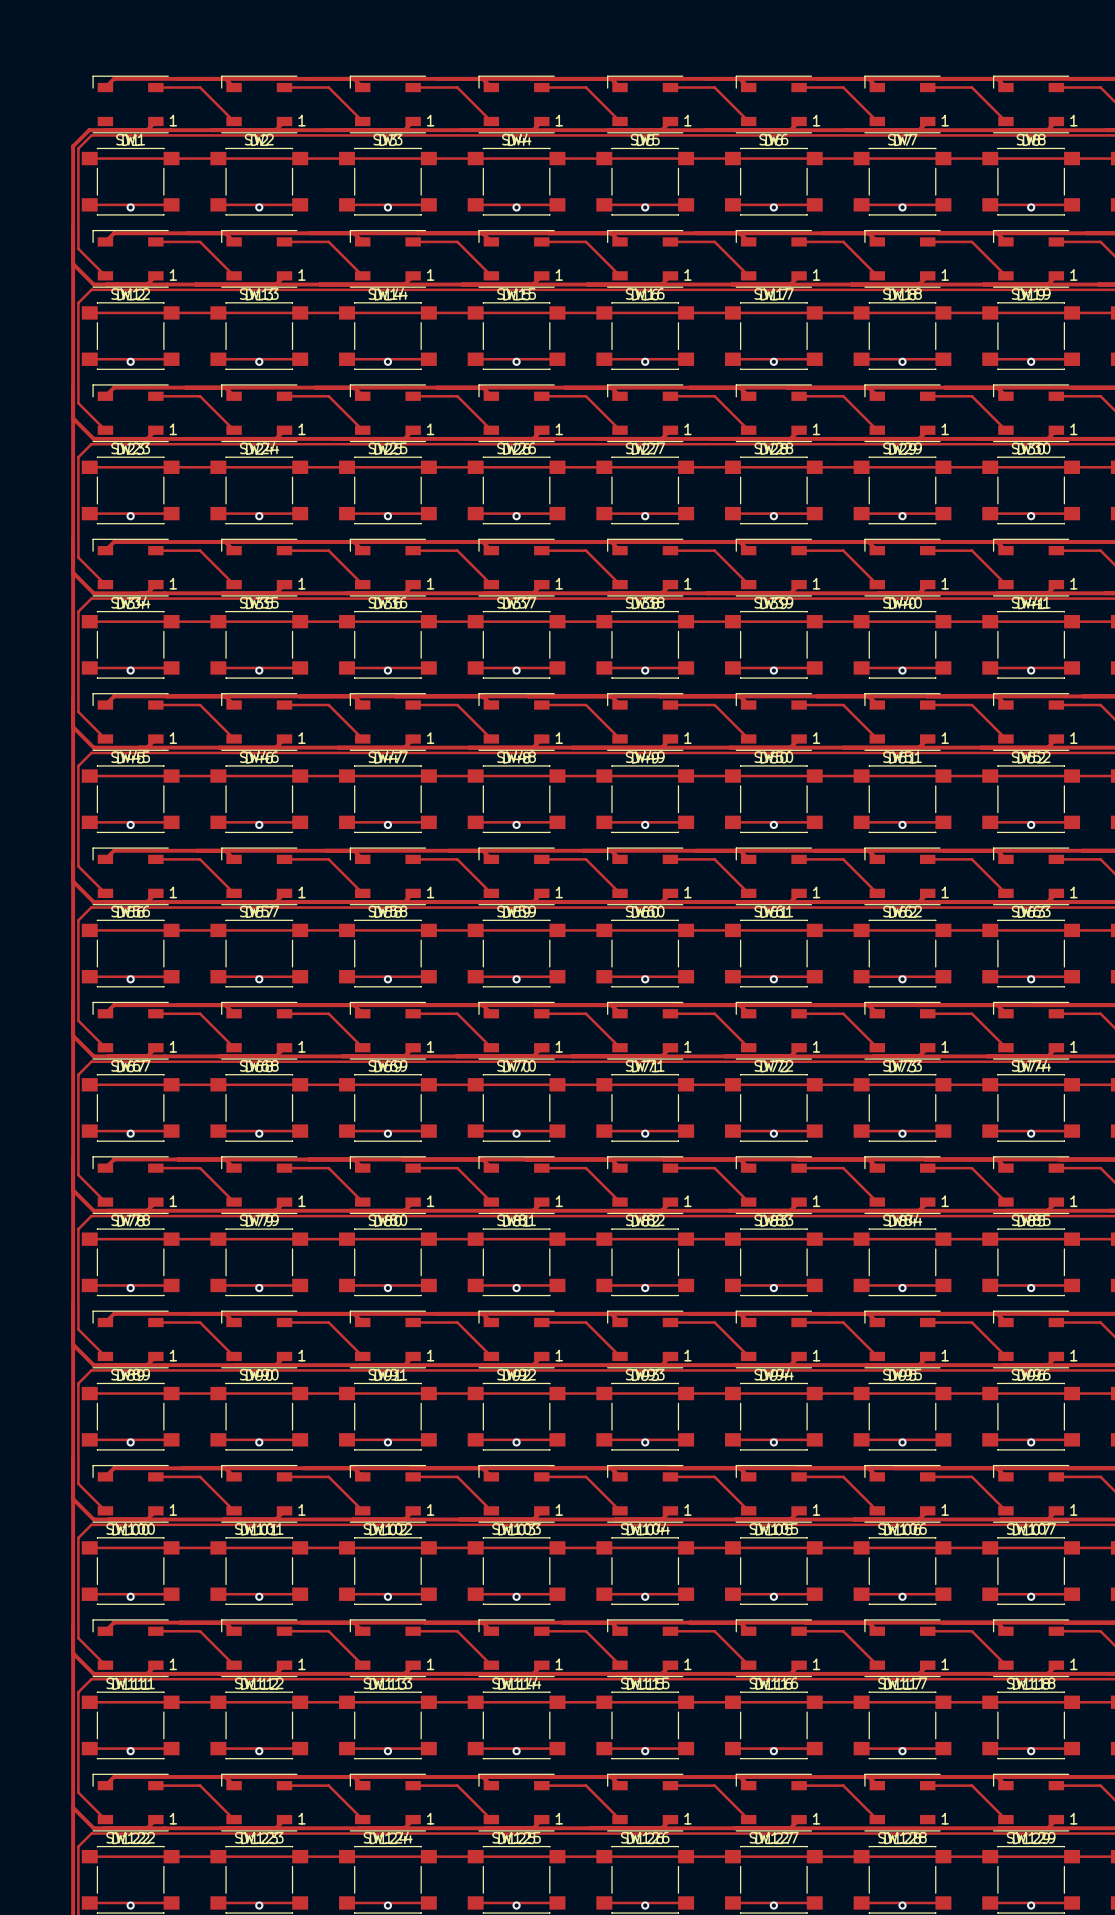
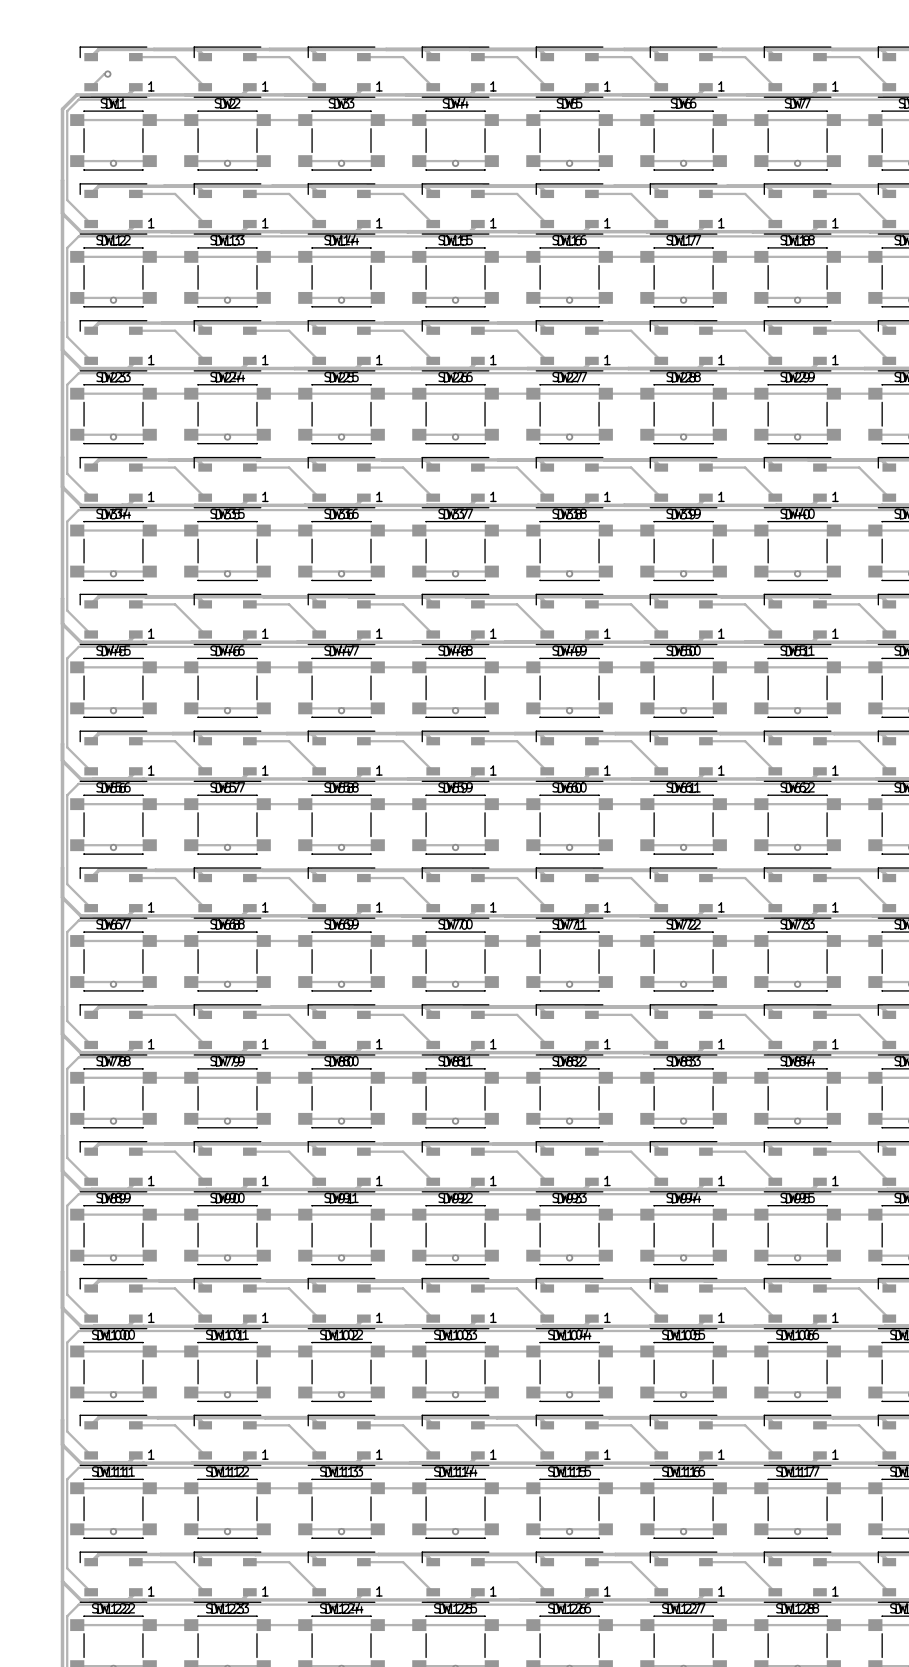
track: none -> (107, 74) (104, 74) (91, 87)
via: none -> (107, 74)

